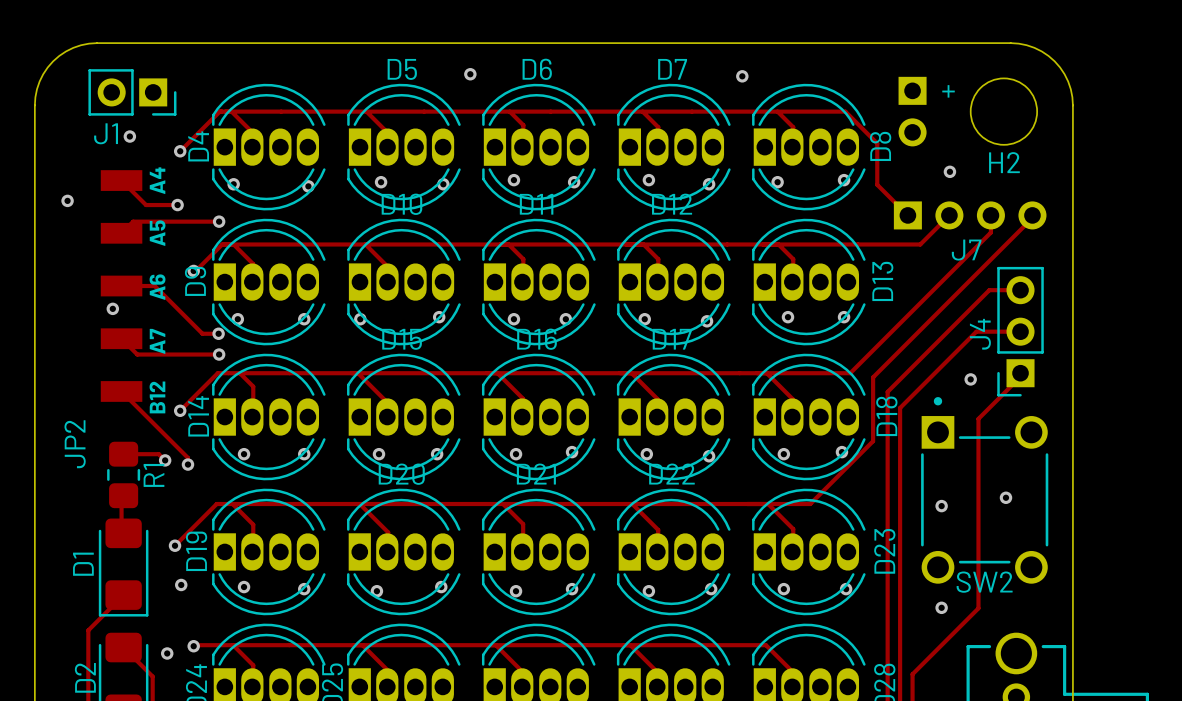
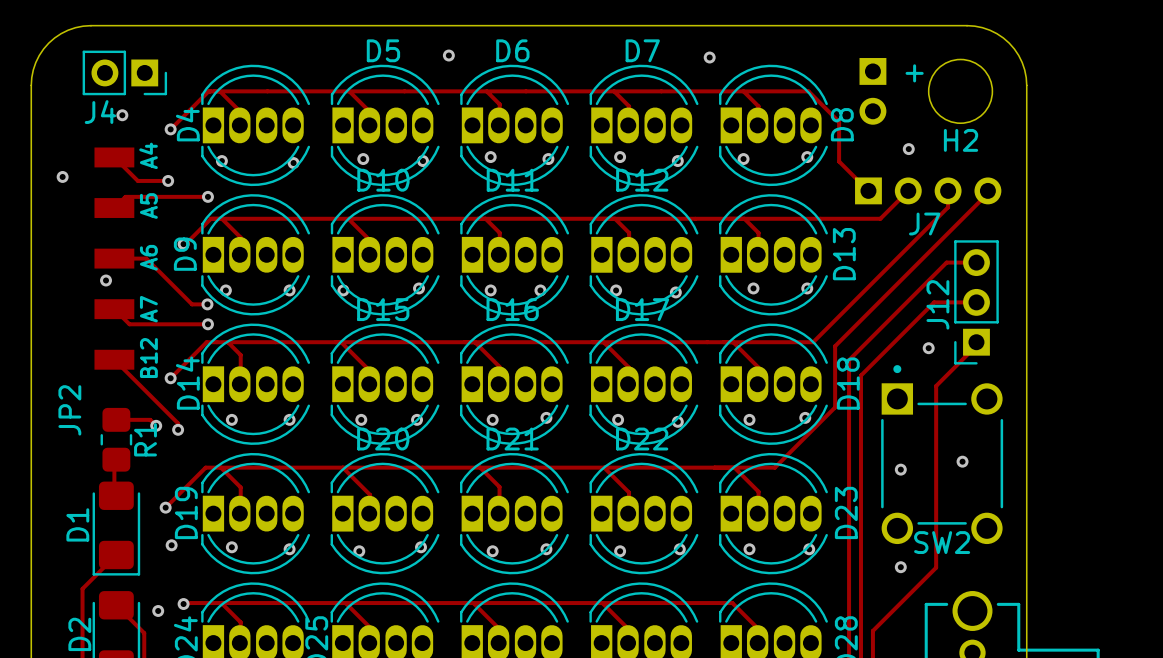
J1 name: J1 (106, 133) -> J4 (100, 112)
J4 name: J4 (980, 334) -> J12 (937, 304)

